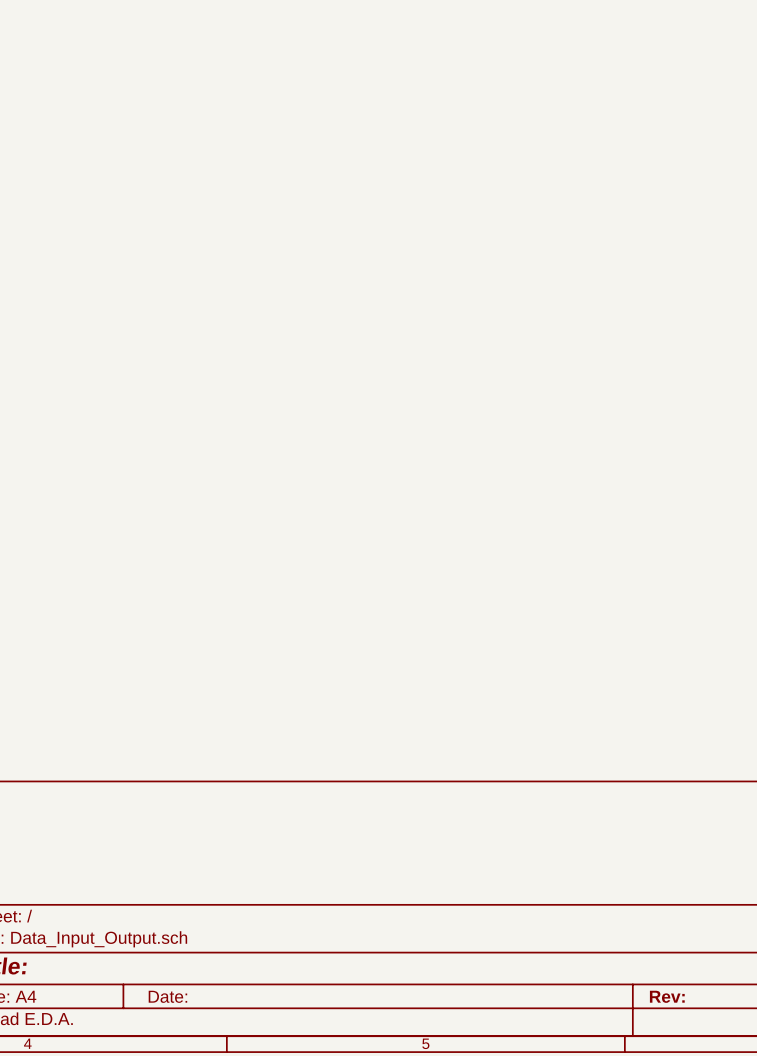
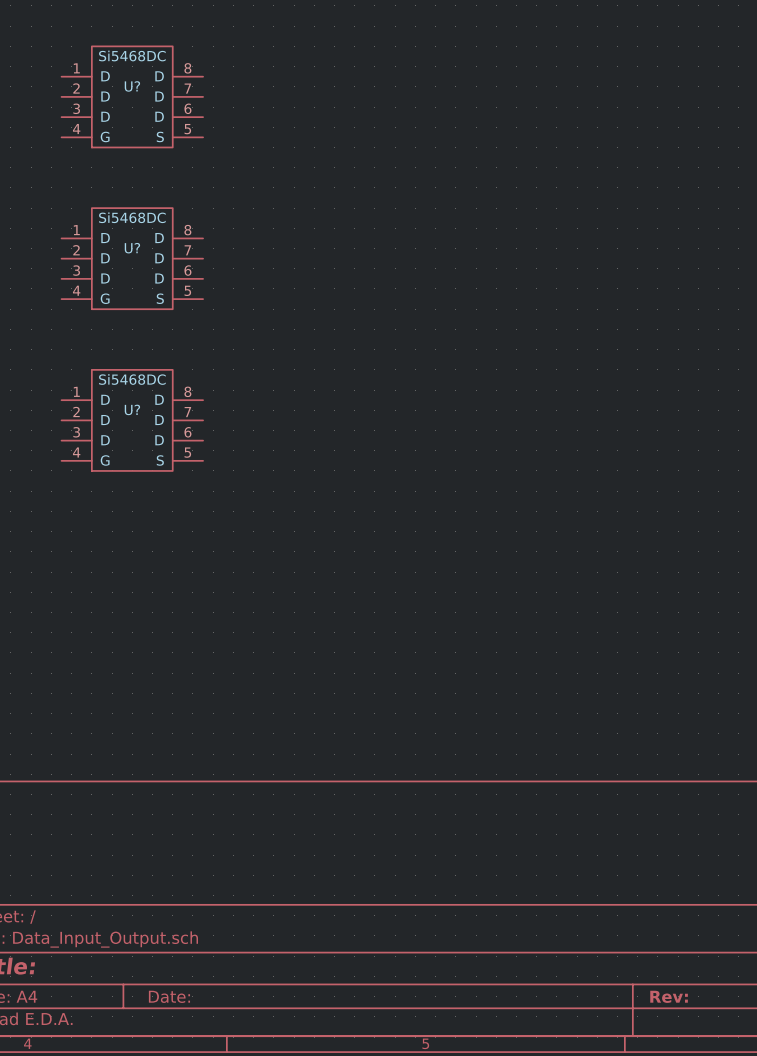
U?: none -> Si5468DC (132, 96)
U?: none -> Si5468DC (132, 258)
U?: none -> Si5468DC (132, 420)

